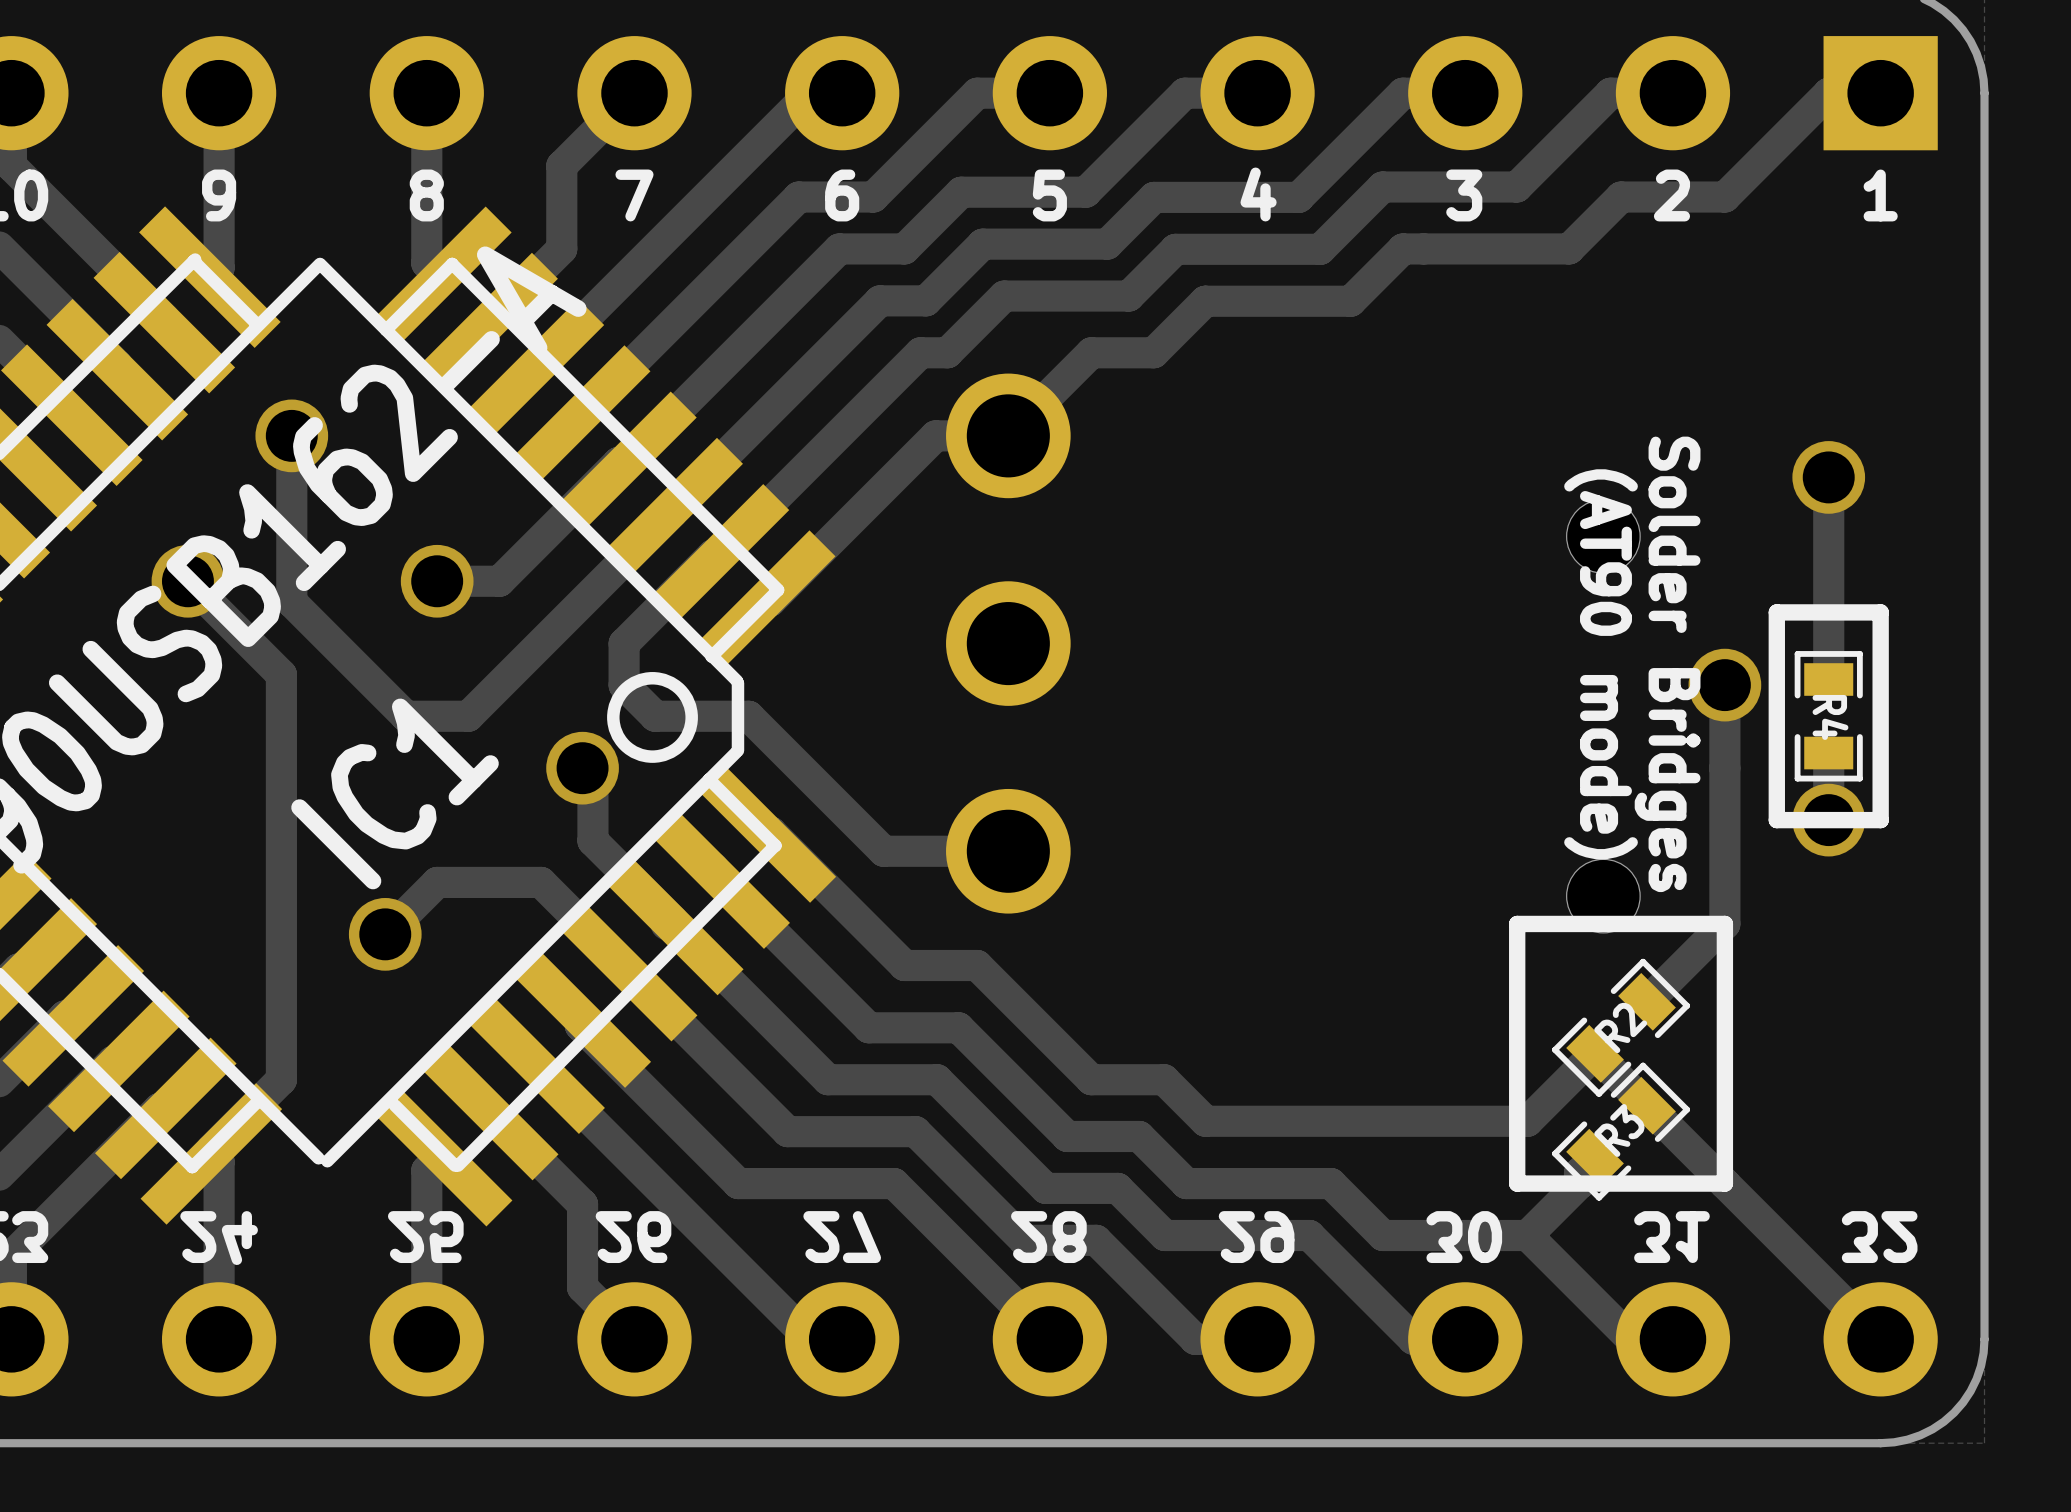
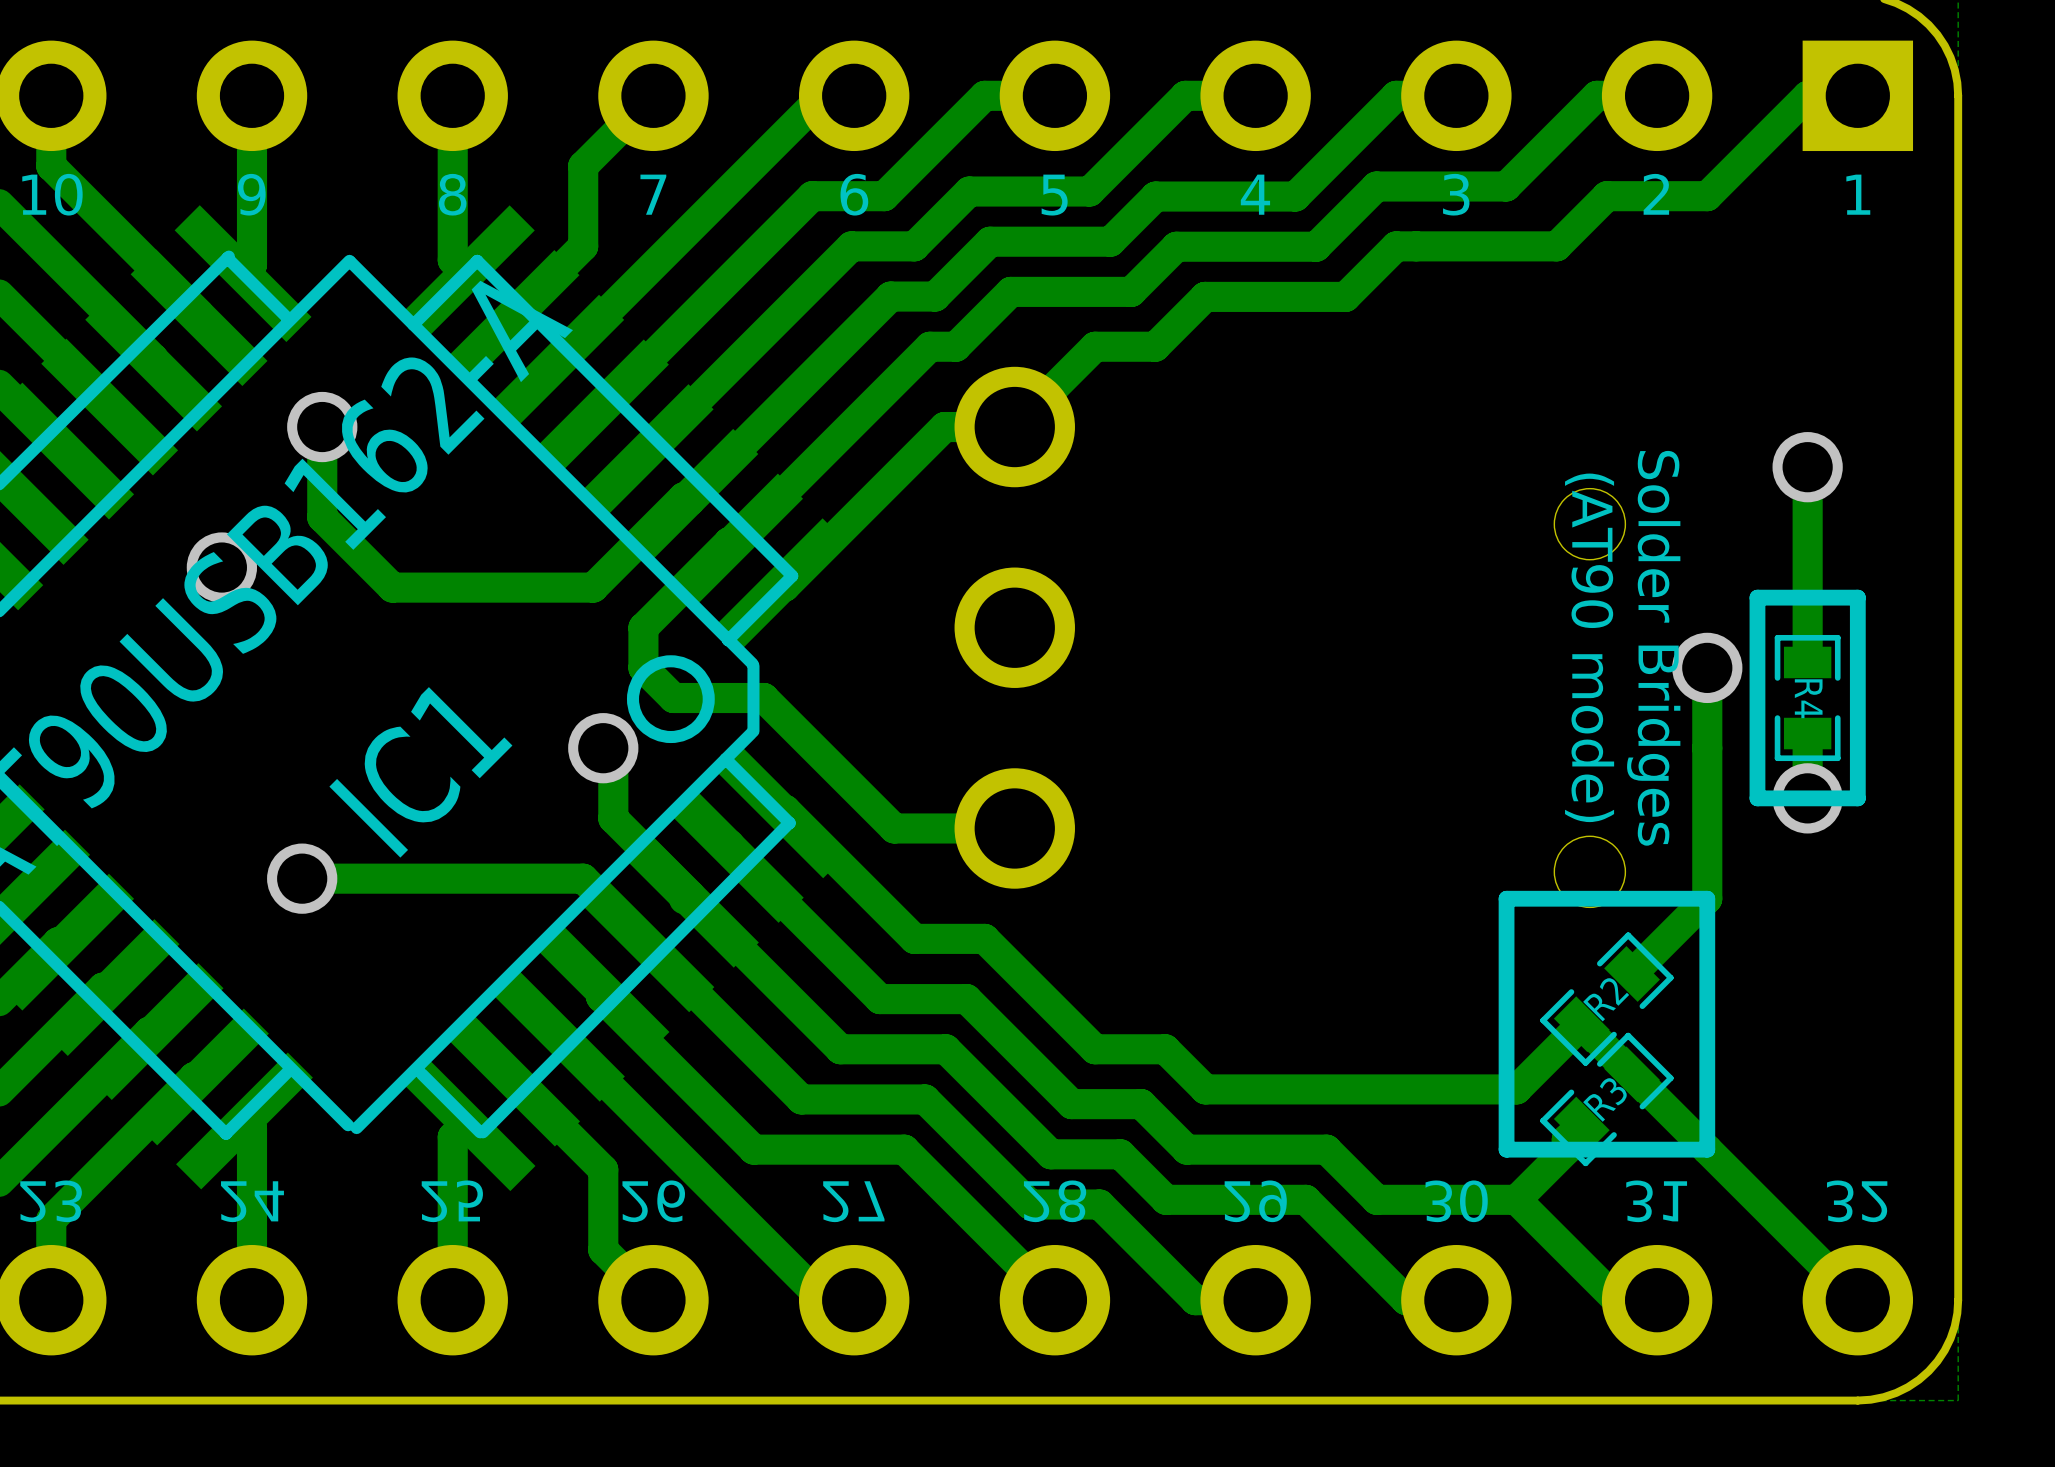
track: (625, 462) (618, 462) (499, 581) (437, 581) -> none
track: (672, 512) (468, 716) (406, 716) (291, 602) (291, 529) -> (689, 497) (683, 497) (593, 587) (392, 587) (322, 517)
track: (187, 581) (281, 674) (281, 1079) (211, 1149) (211, 1153) -> none
via: (437, 581) -> none
track: (561, 903) (541, 882) (437, 882) (385, 934) -> (583, 878) (302, 878)
via position: (385, 934) -> (302, 878)

